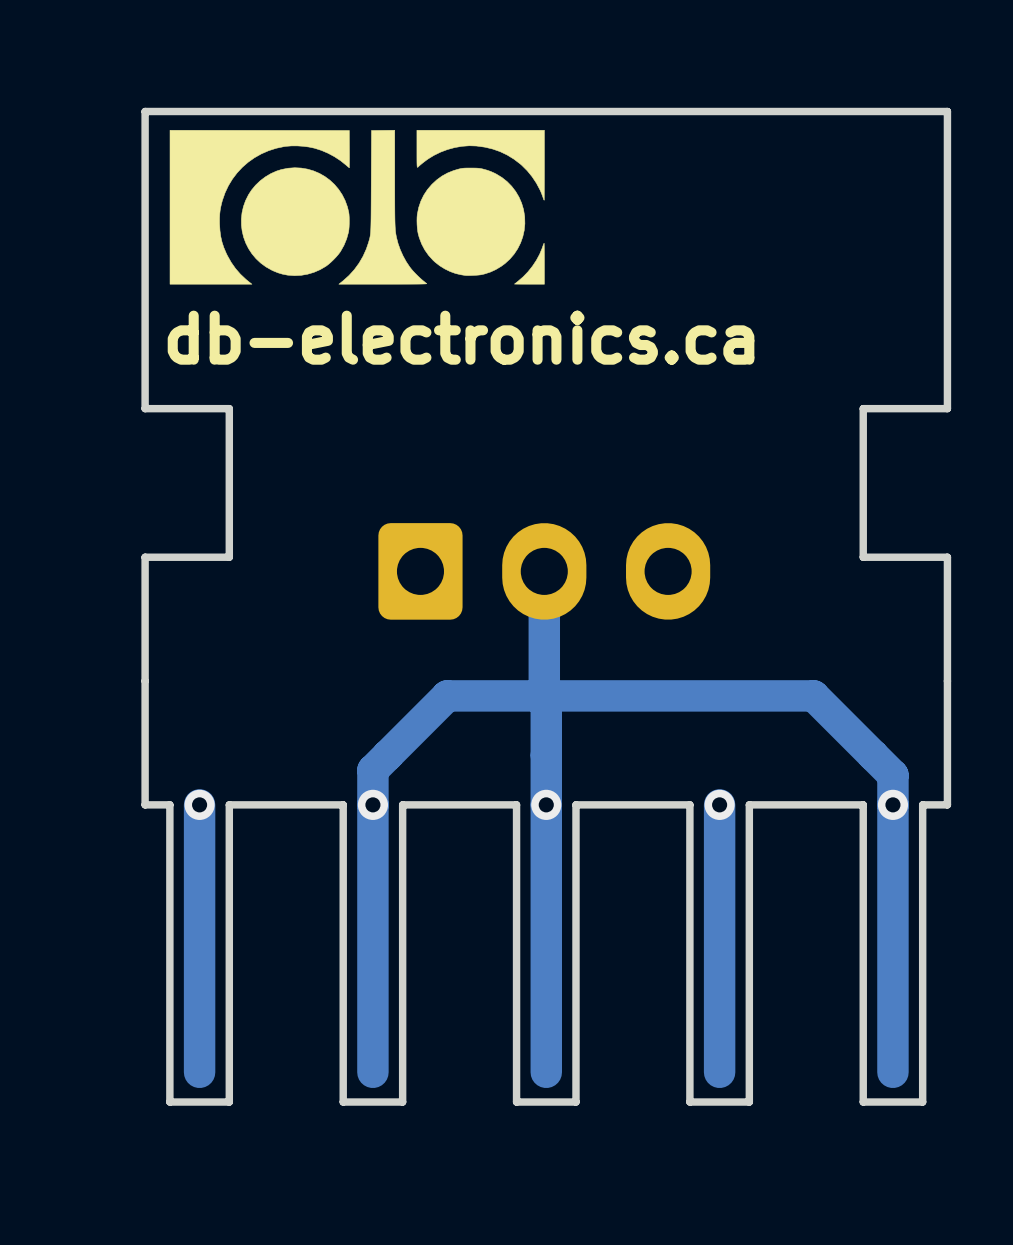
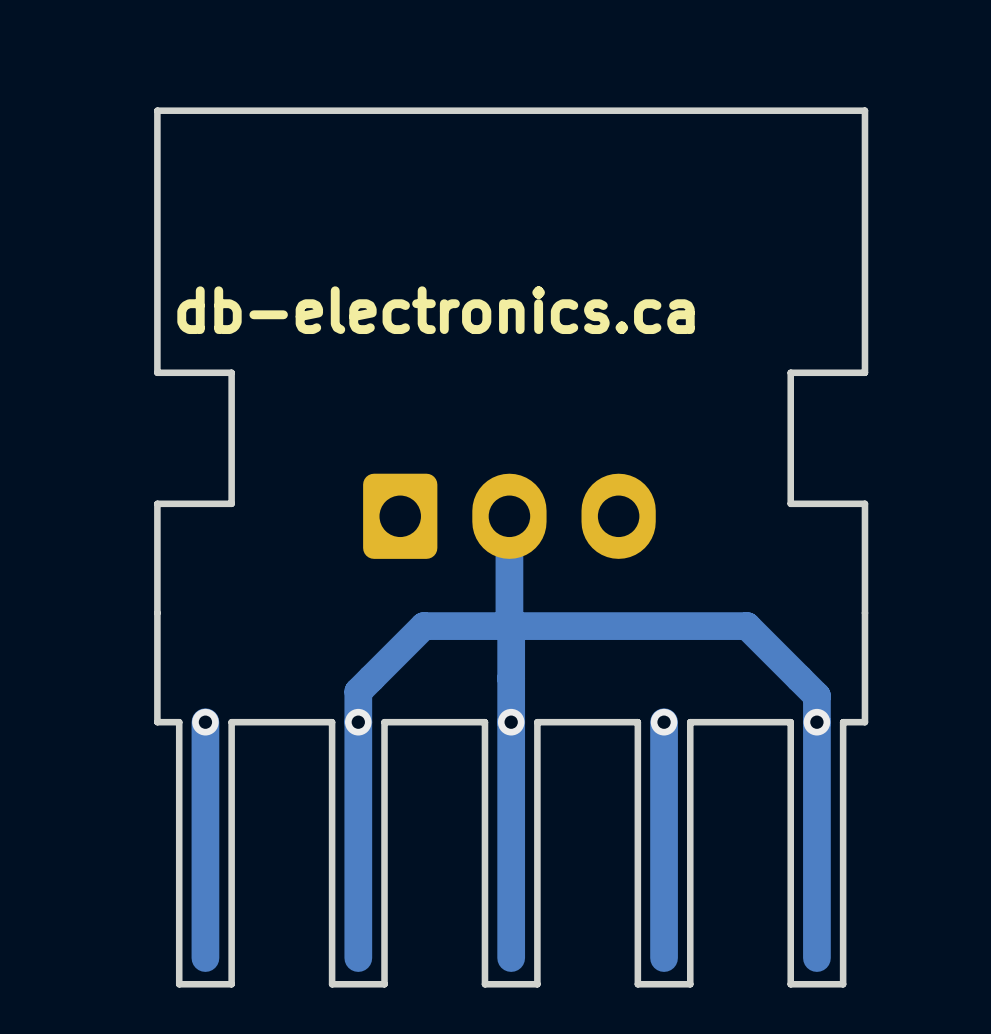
drawing: [169, 130, 545, 285] -> none

